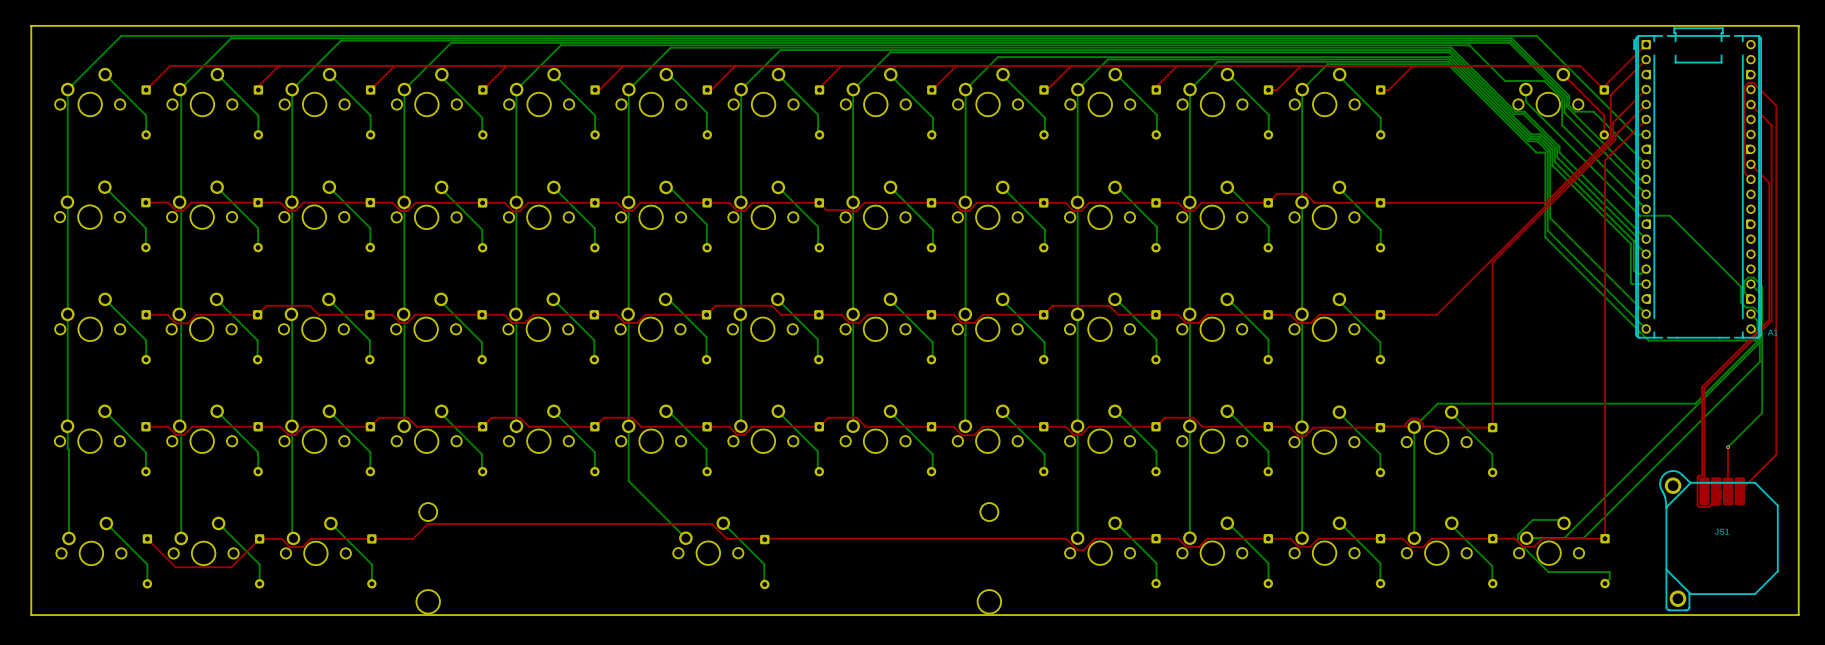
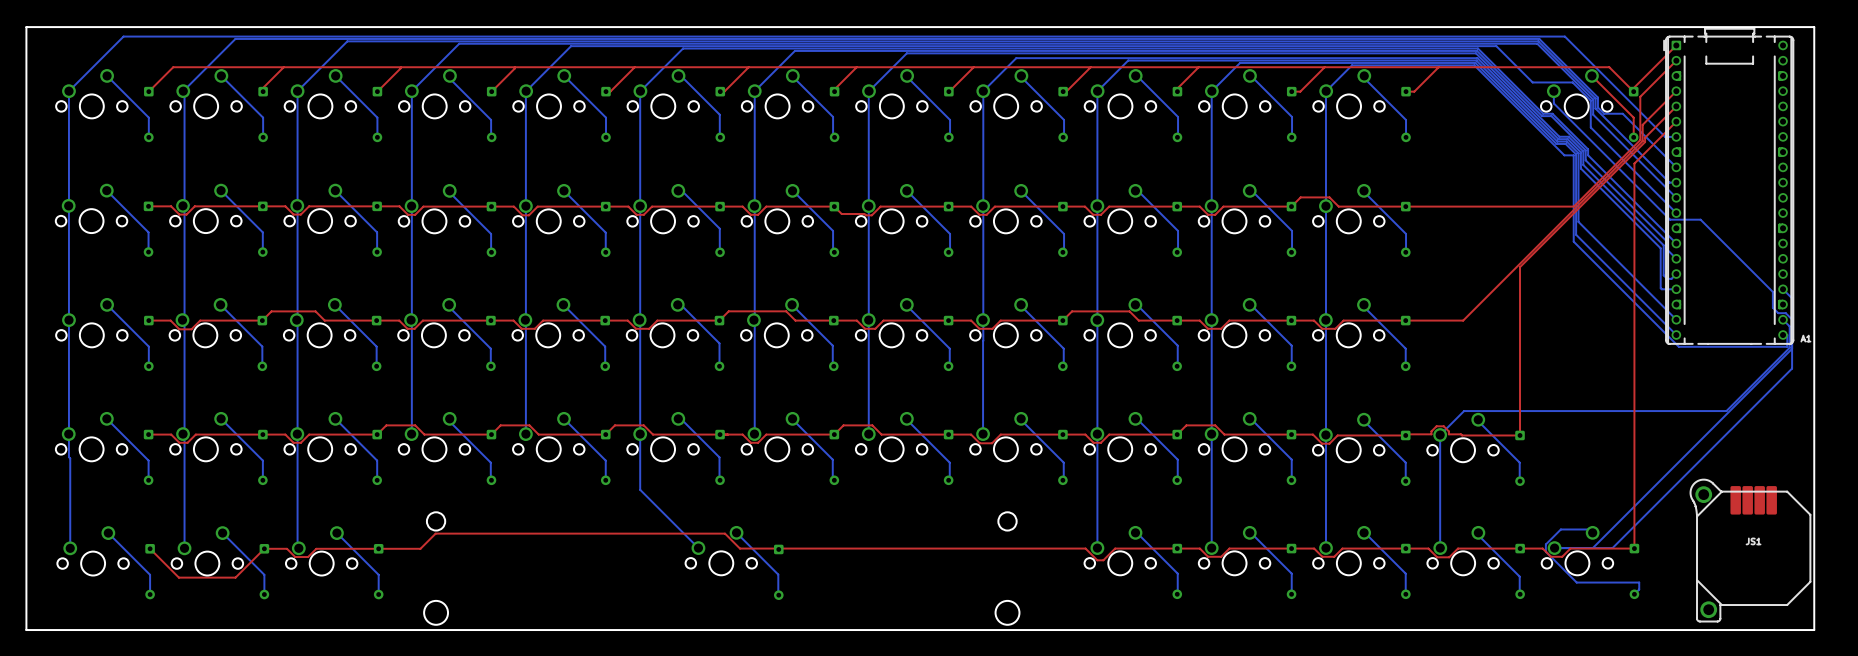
board edge: (31, 25) (1798, 25) (1798, 615) (31, 615) (31, 25) -> (26, 27) (26, 630) (1814, 630) (1814, 27) (26, 27)
top track: (1750, 104) (1771, 125) (1771, 320) (1704, 387) (1704, 491) -> none
top track: (1750, 164) (1769, 182) (1769, 319) (1702, 386) (1702, 475) (1697, 477) (1697, 505) (1699, 507) (1709, 507) (1711, 504) (1716, 504) (1716, 491) (1721, 491) (1721, 497) -> none
top track: (1750, 179) (1744, 172) (1744, 86) (1748, 83) (1753, 83) (1776, 105) (1776, 454) (1739, 491) -> none
bottom track: (1750, 299) (1744, 292) (1744, 281) (1748, 277) (1753, 277) (1762, 286) (1762, 412) (1728, 447) -> none
top track: (1728, 447) (1728, 491) -> none
via: (1728, 447) -> none

